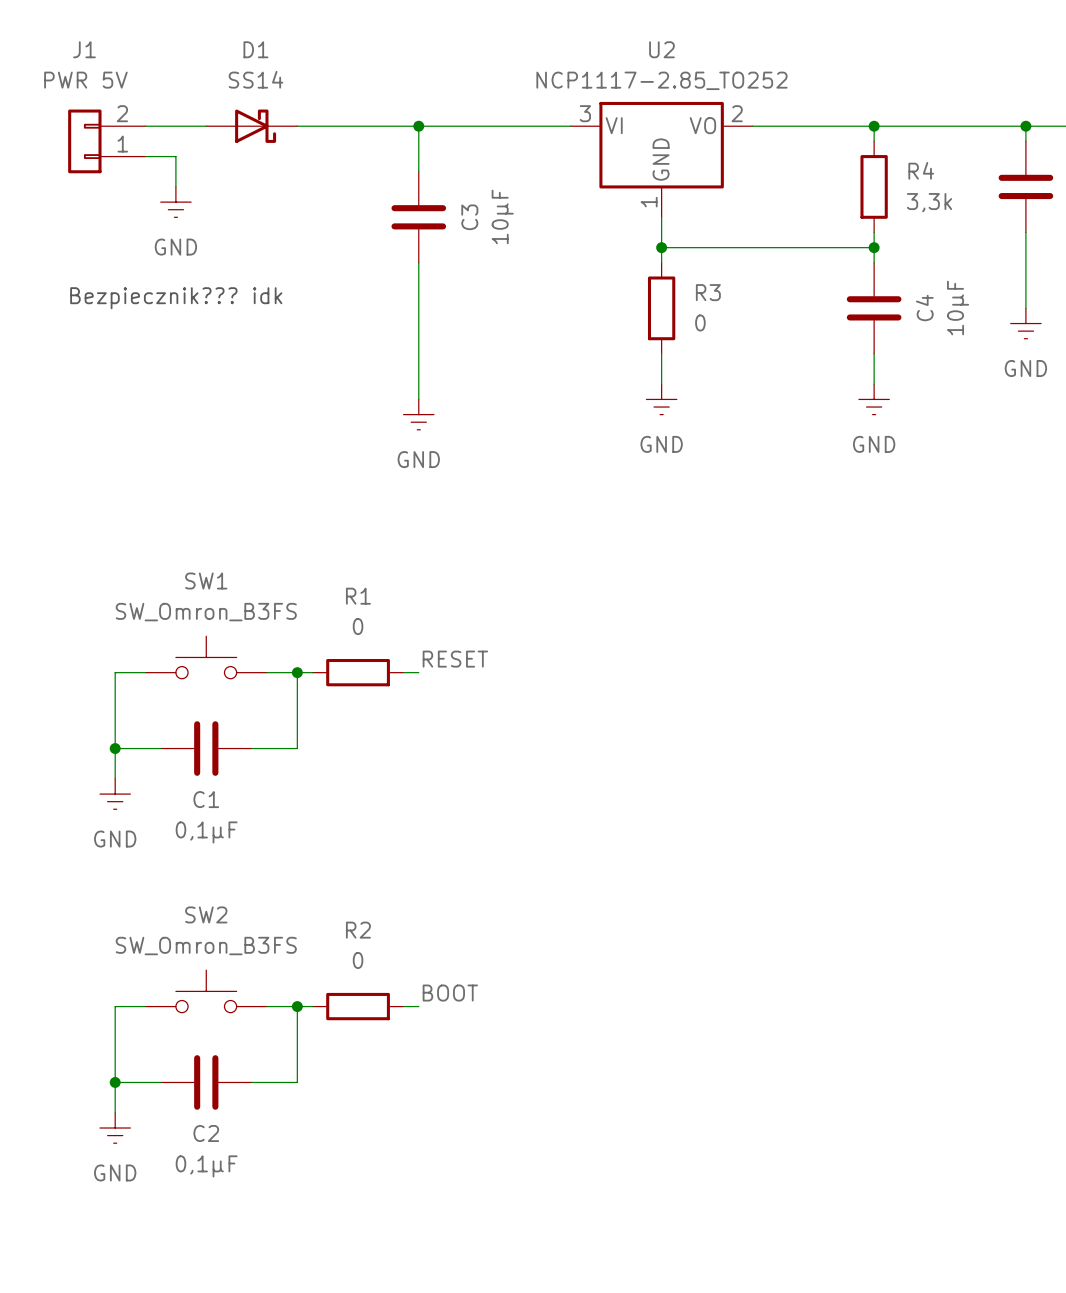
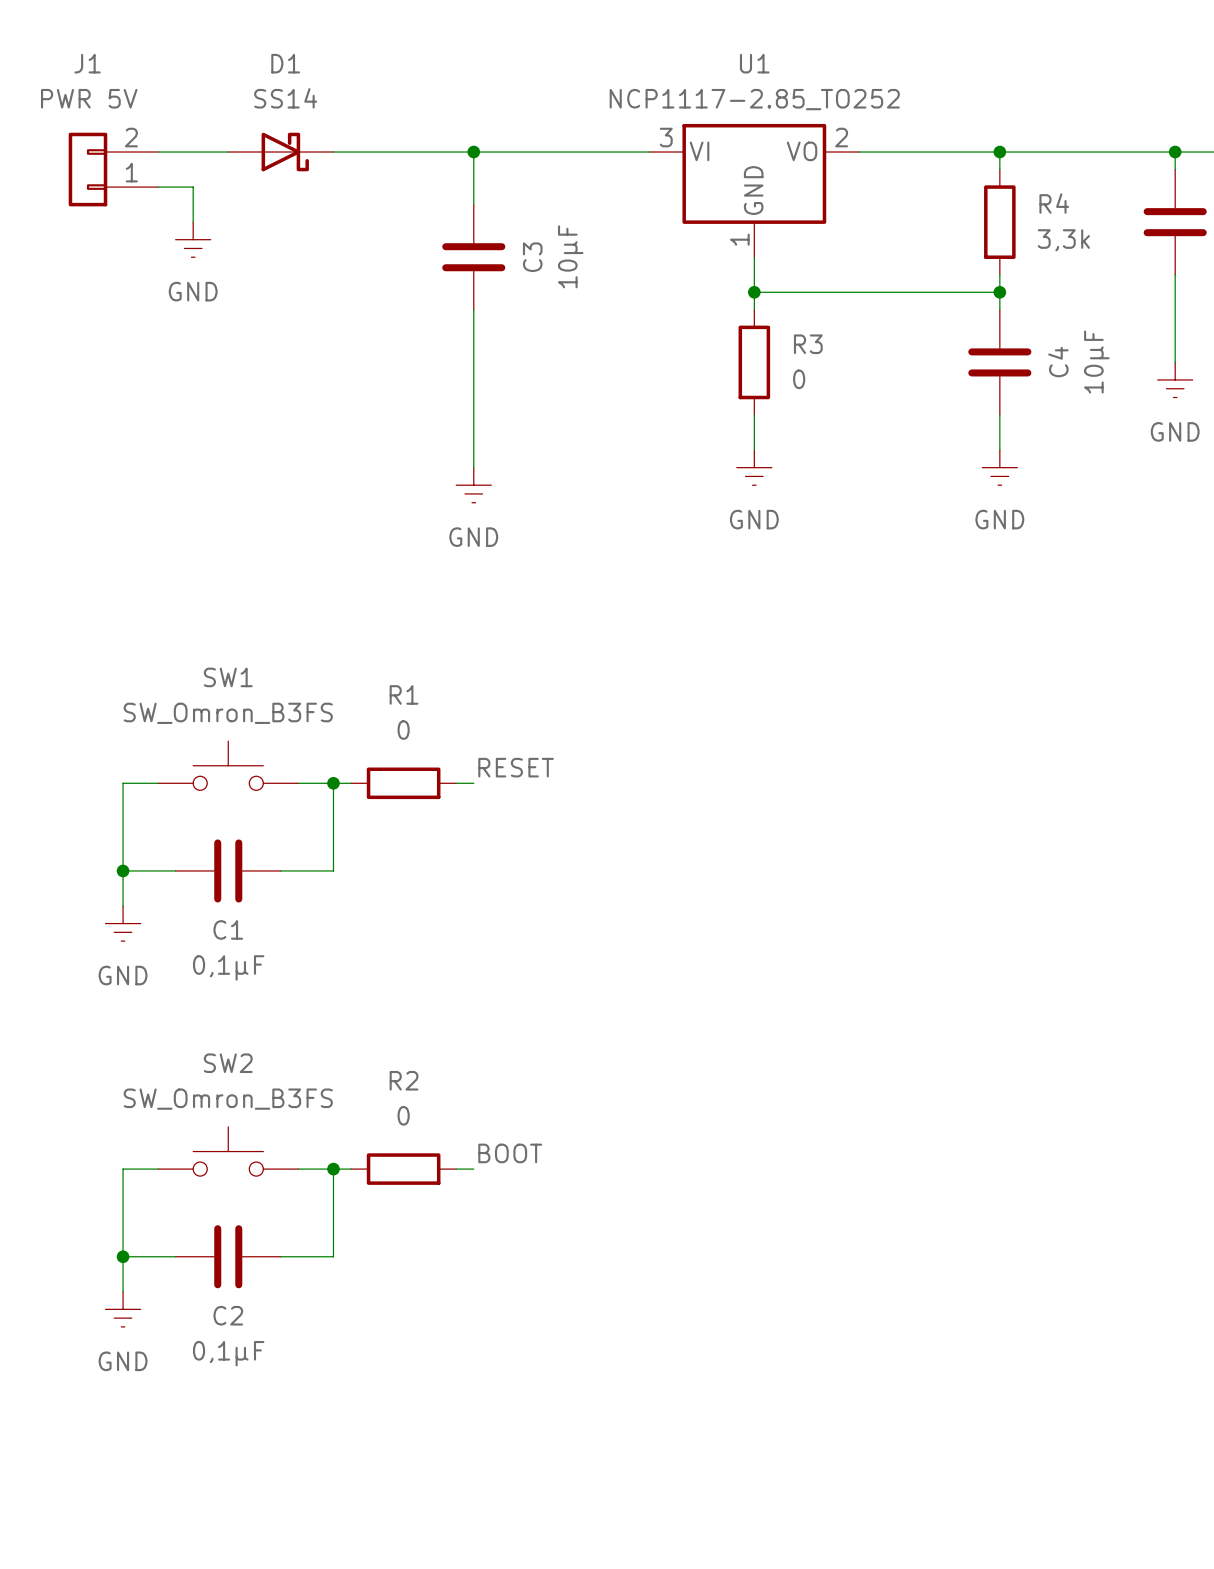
U2 name: U2 (661, 49) -> U1 (754, 63)
text: Bezpiecznik??? idk (176, 298) -> none

